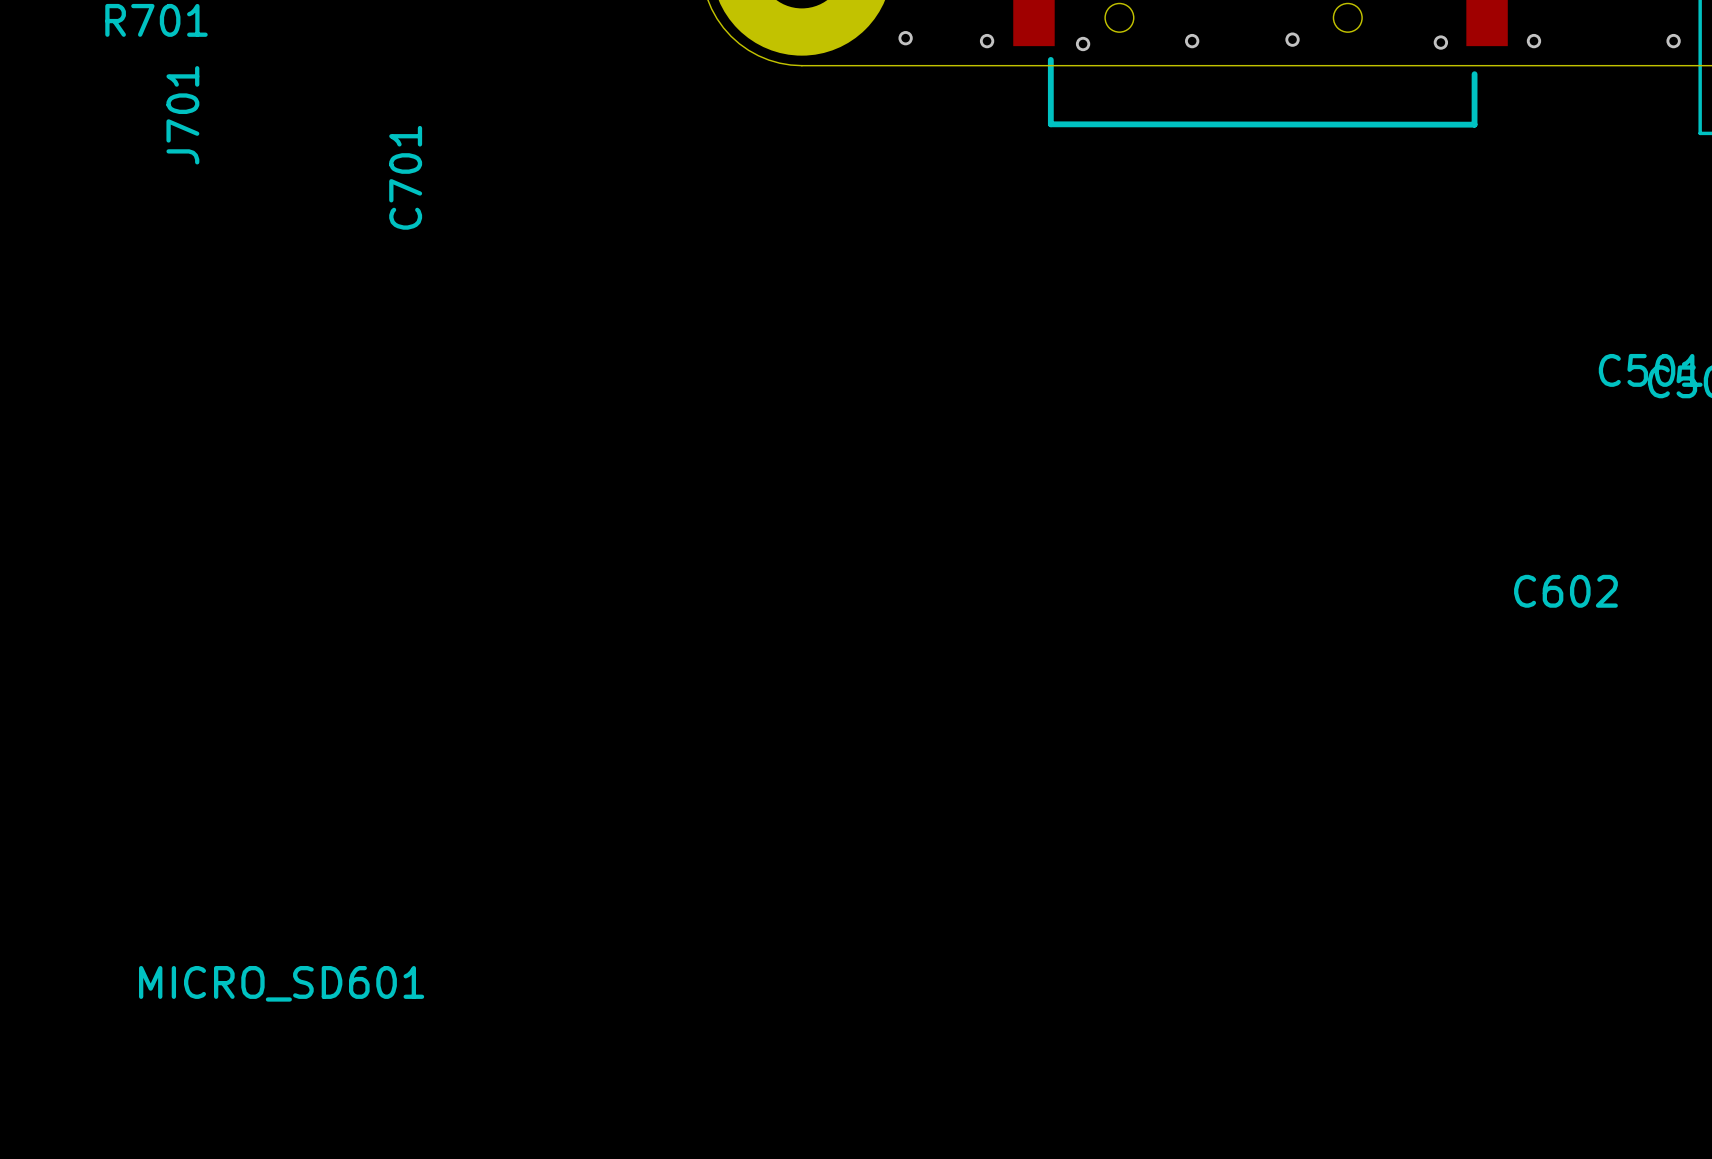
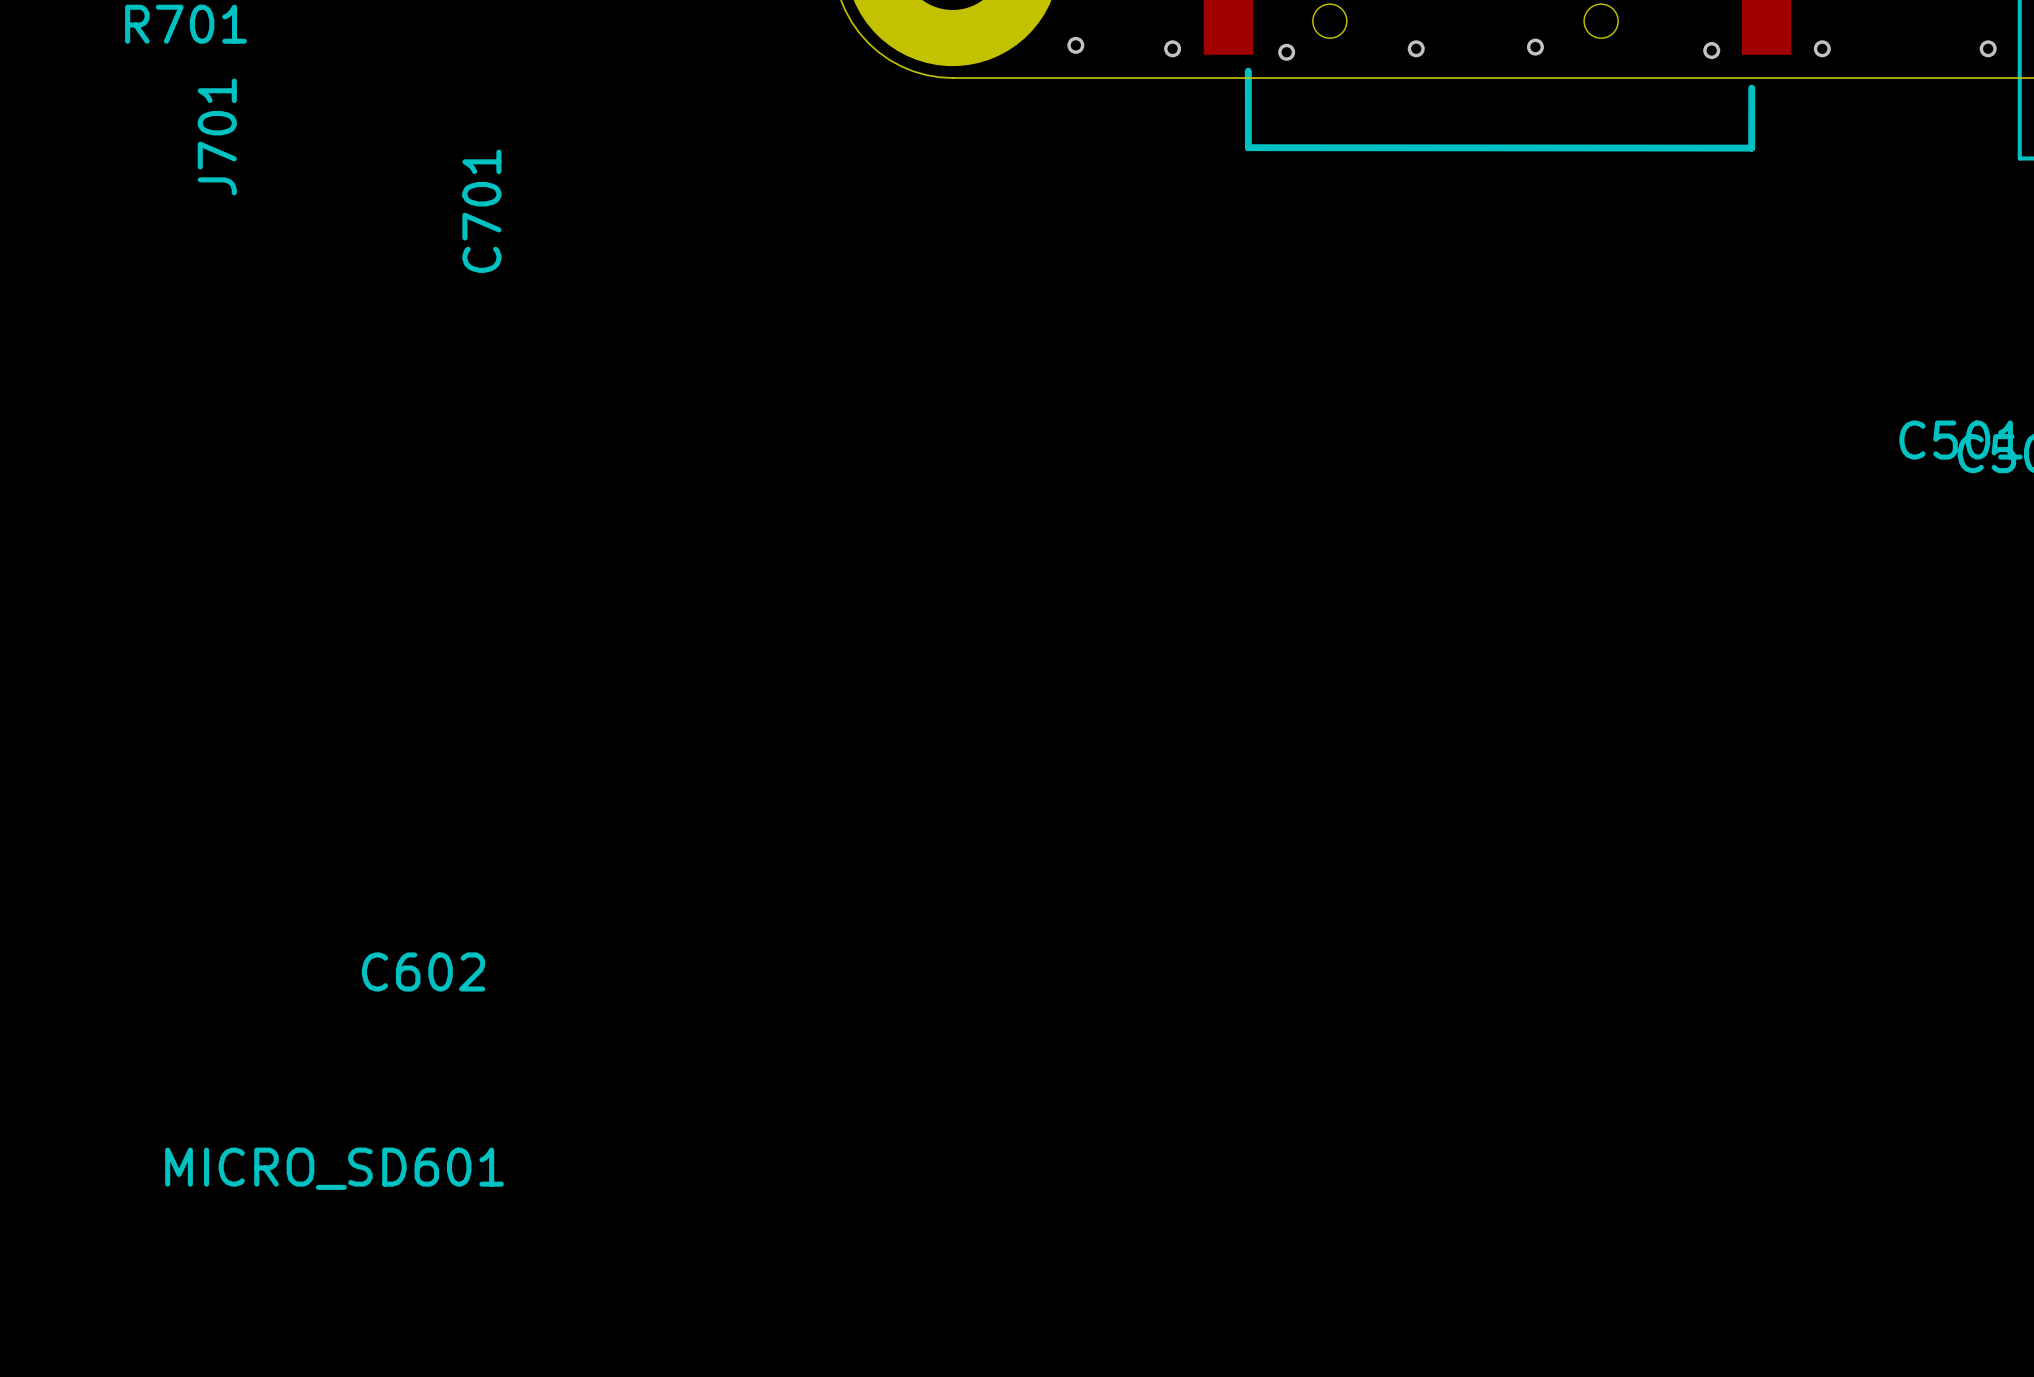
C602 name position: C602 (1565, 591) -> C602 (423, 971)

